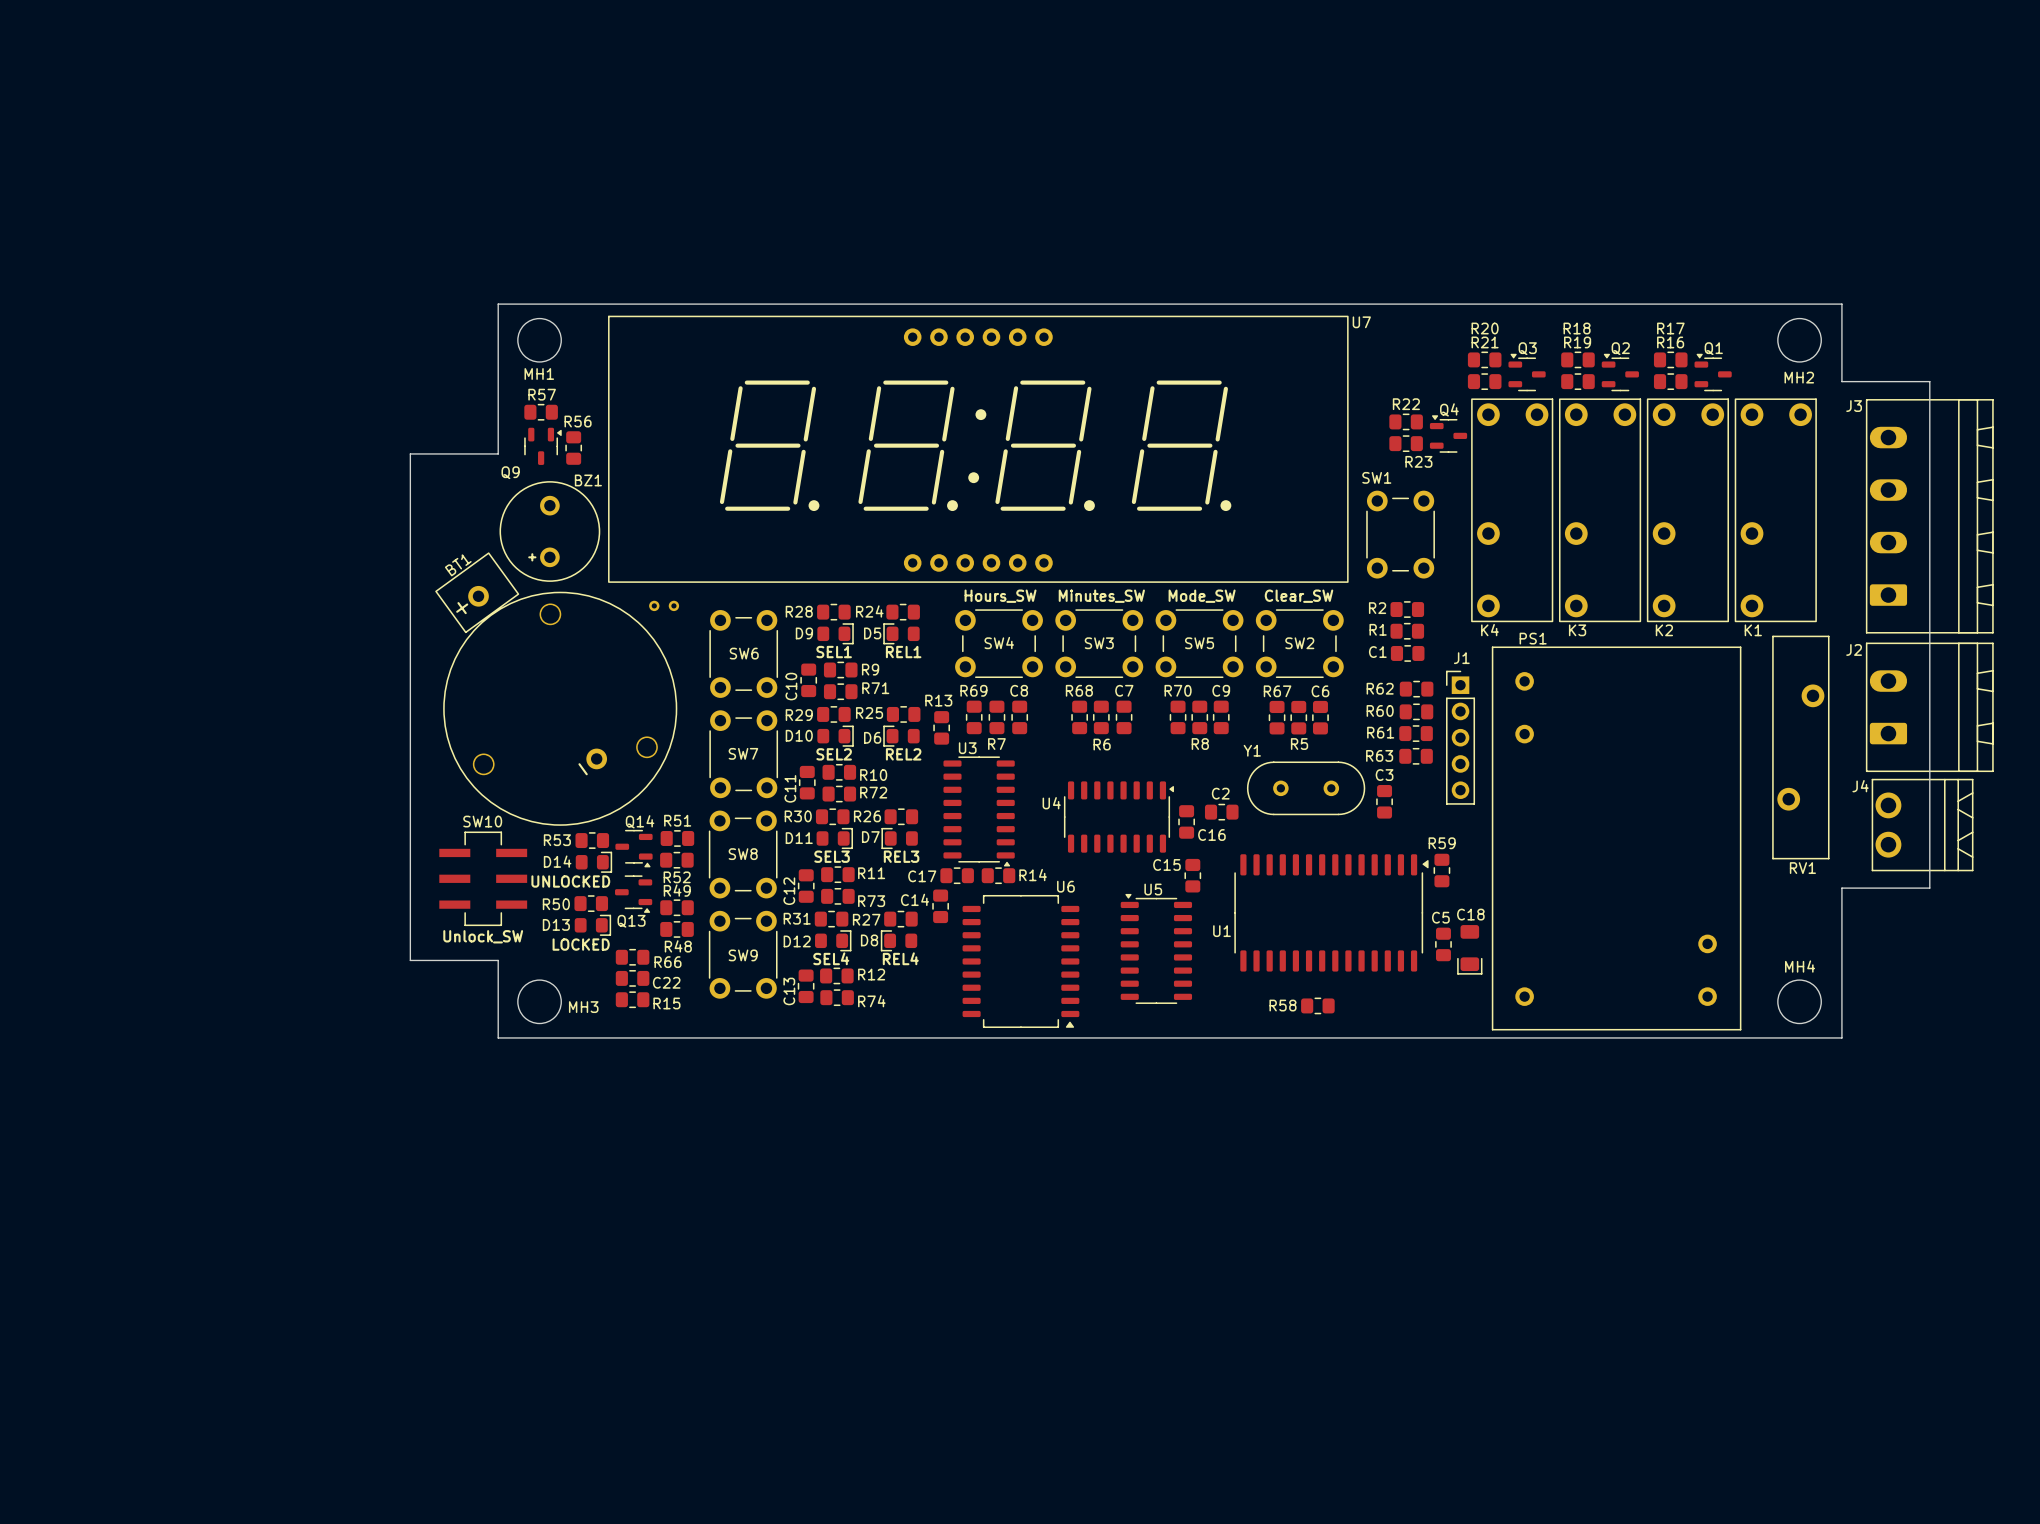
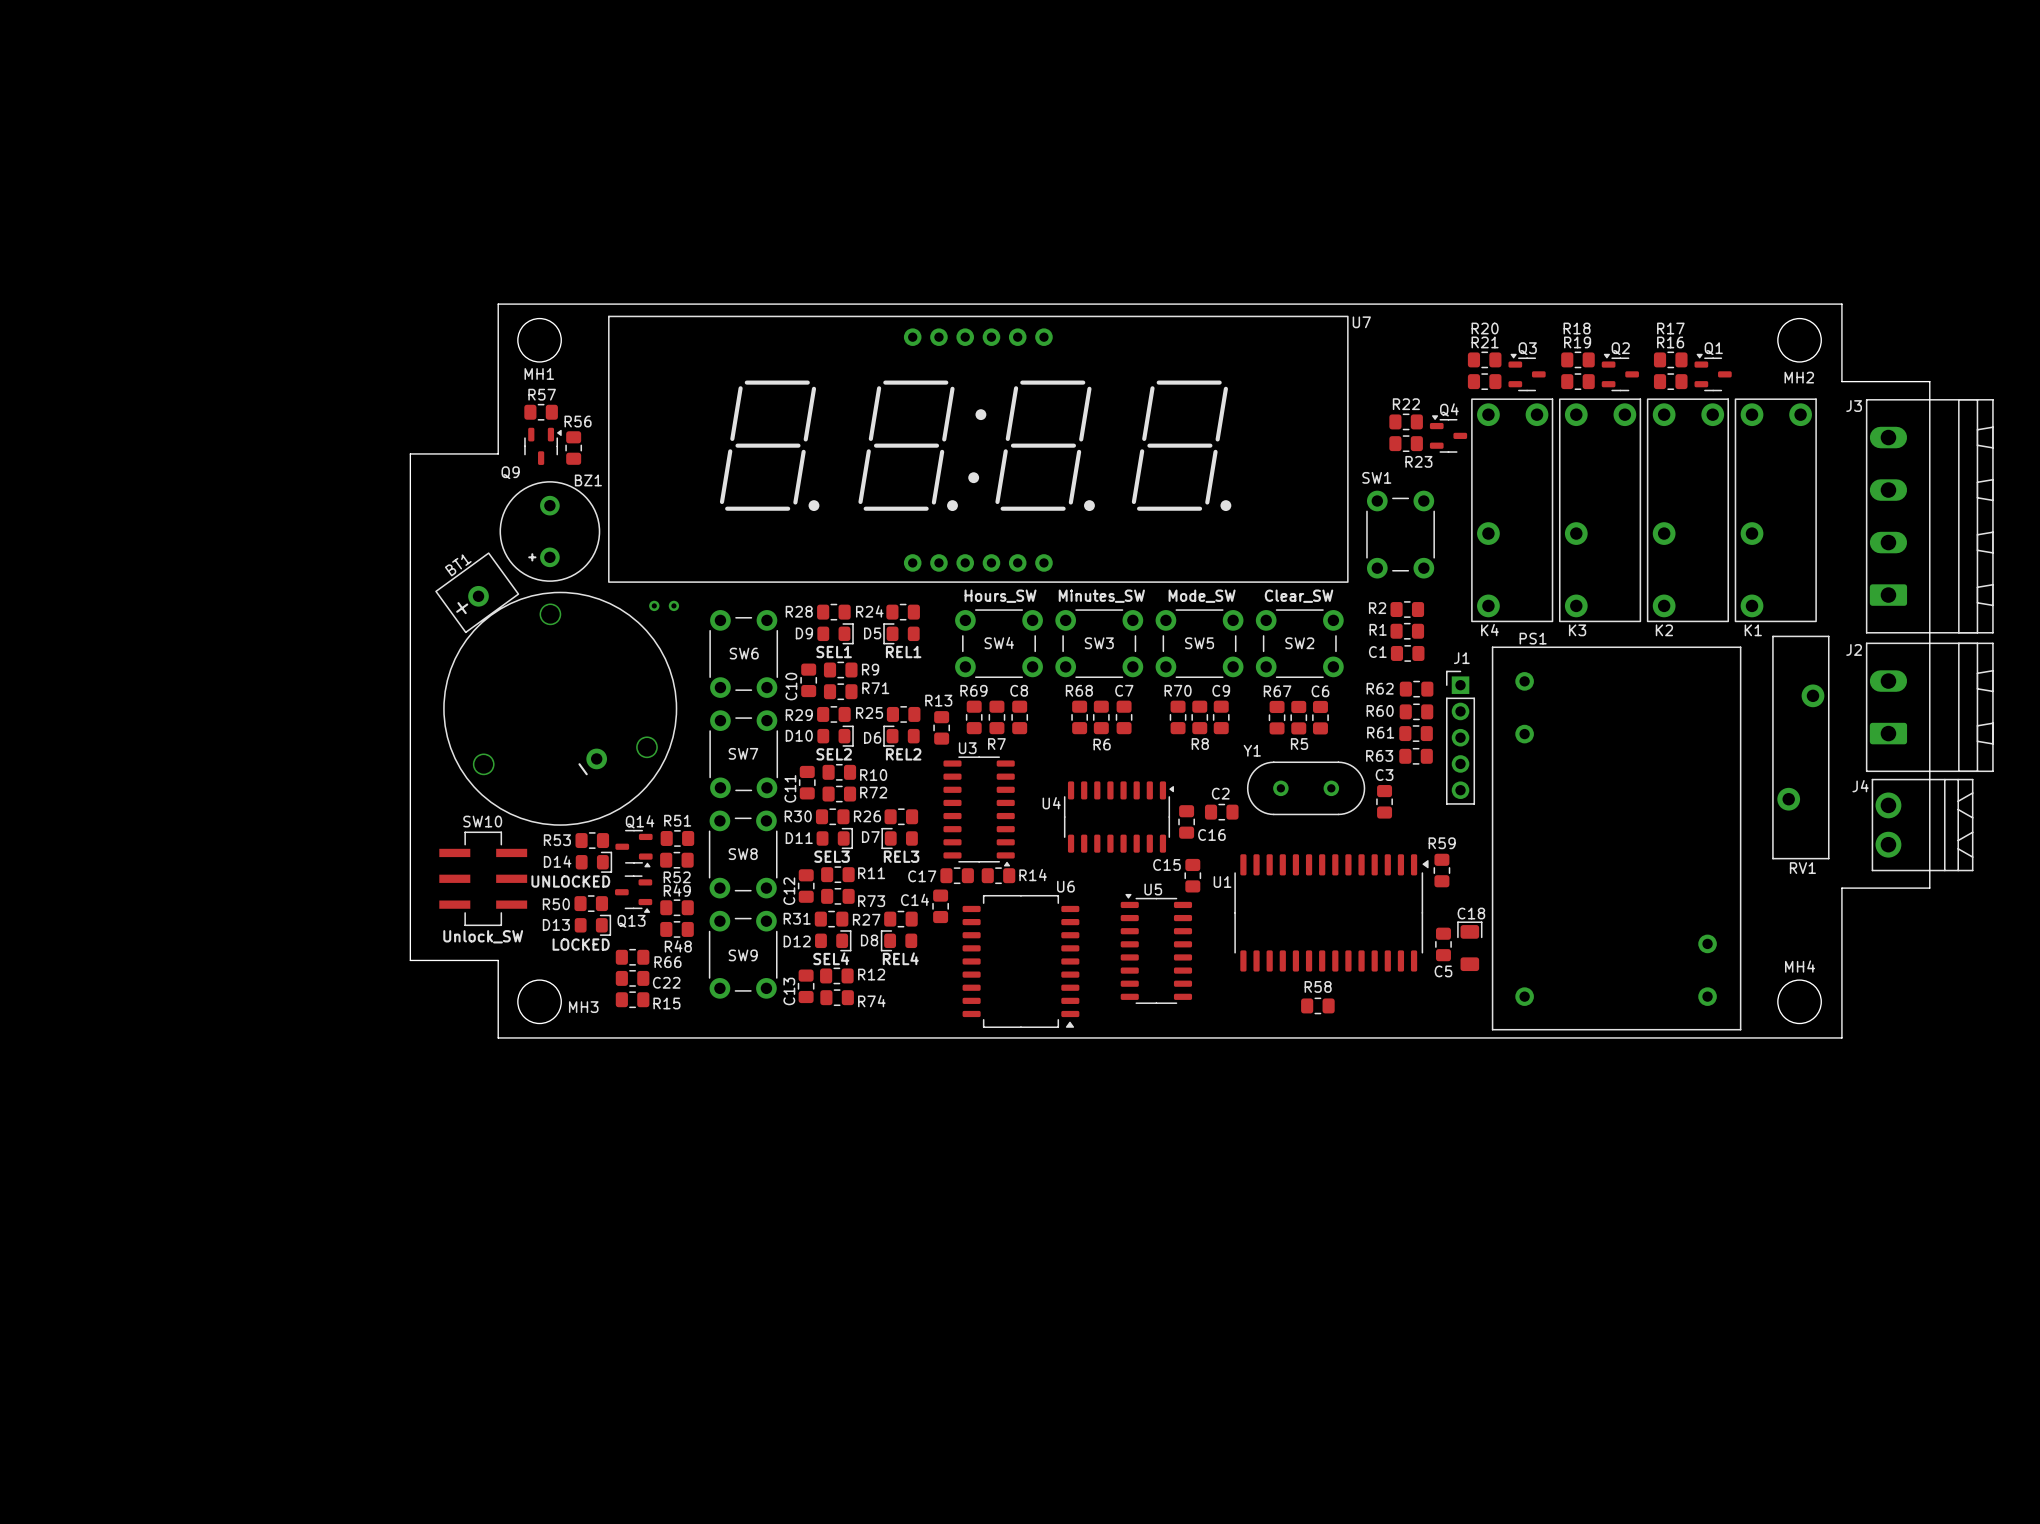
C5 name position: C5 (1440, 917) -> C5 (1443, 971)
U1 name position: U1 (1222, 931) -> U1 (1222, 882)
C18 rotation: 0° (1469, 949) -> 180° (1469, 946)
R58 name position: R58 (1282, 1005) -> R58 (1318, 986)

